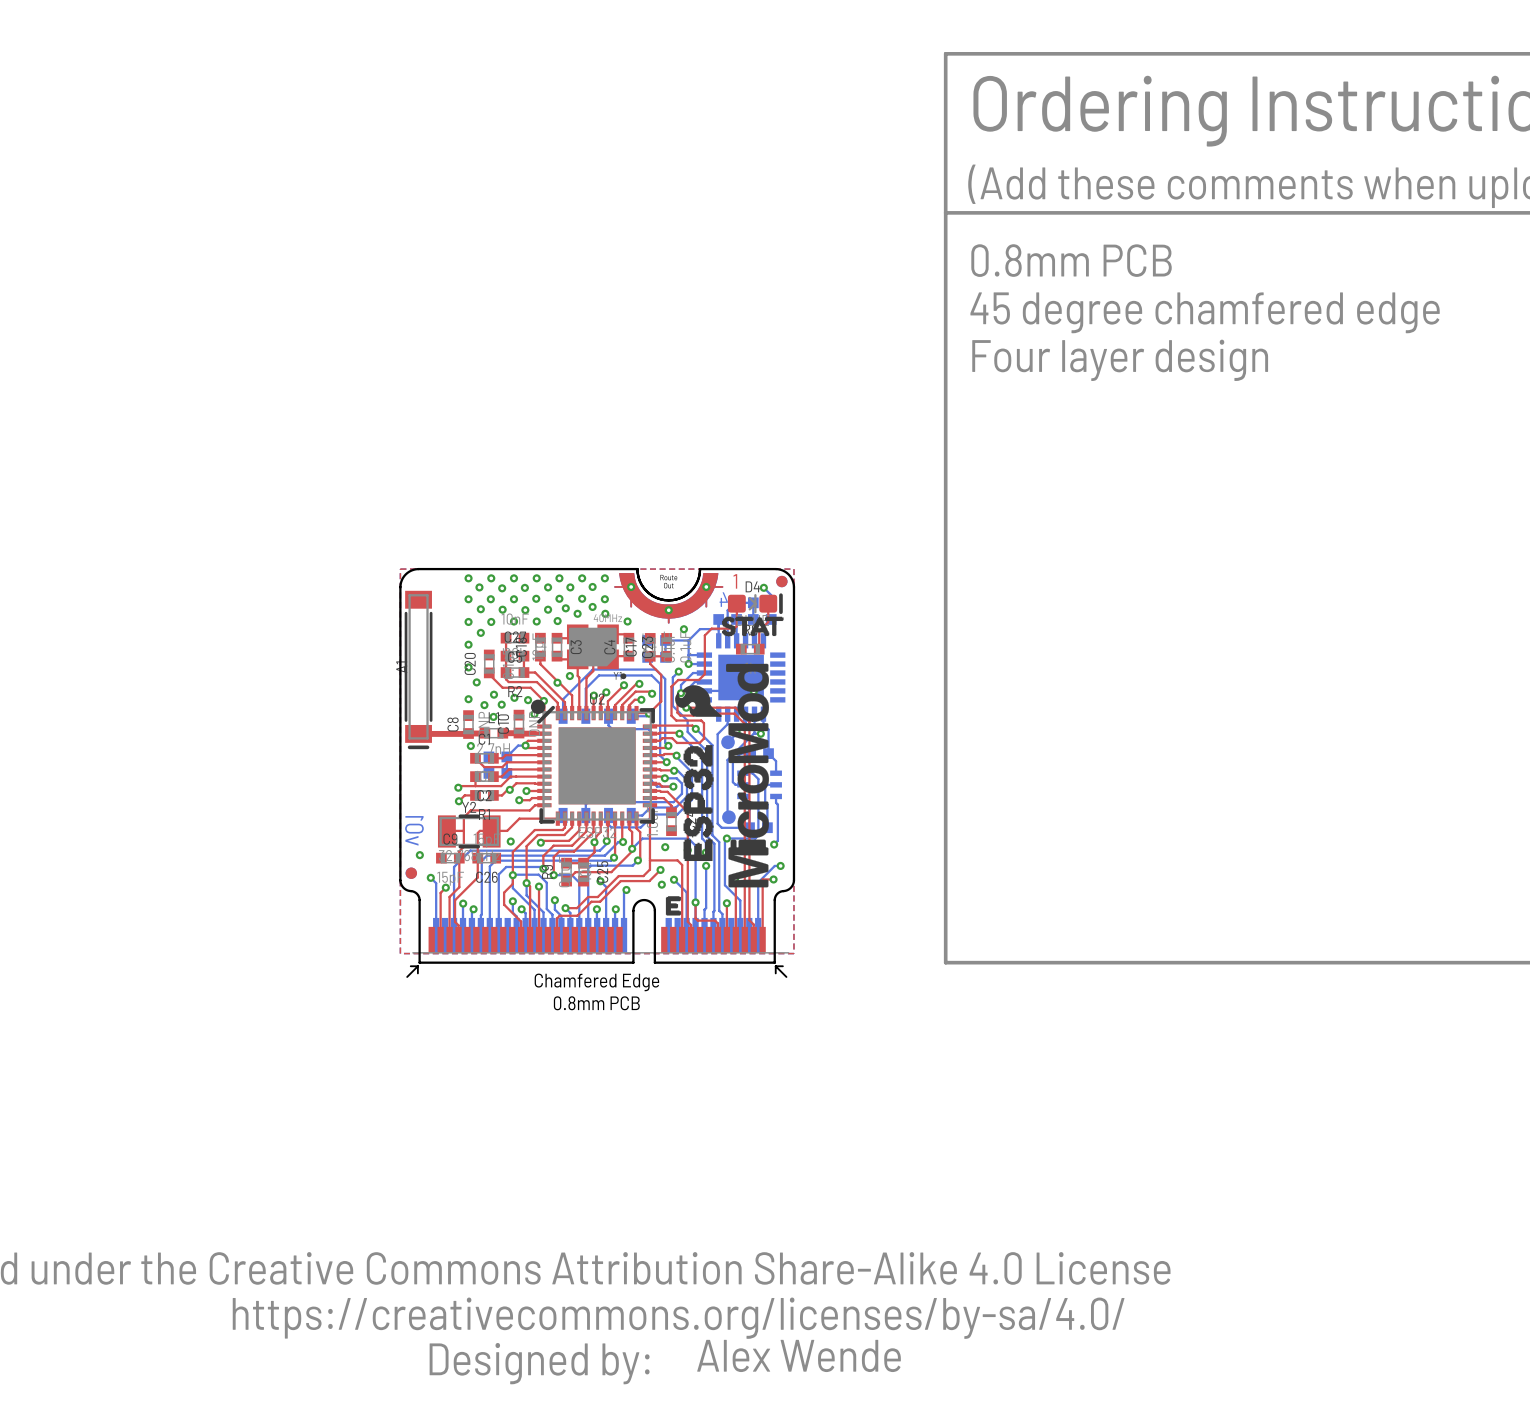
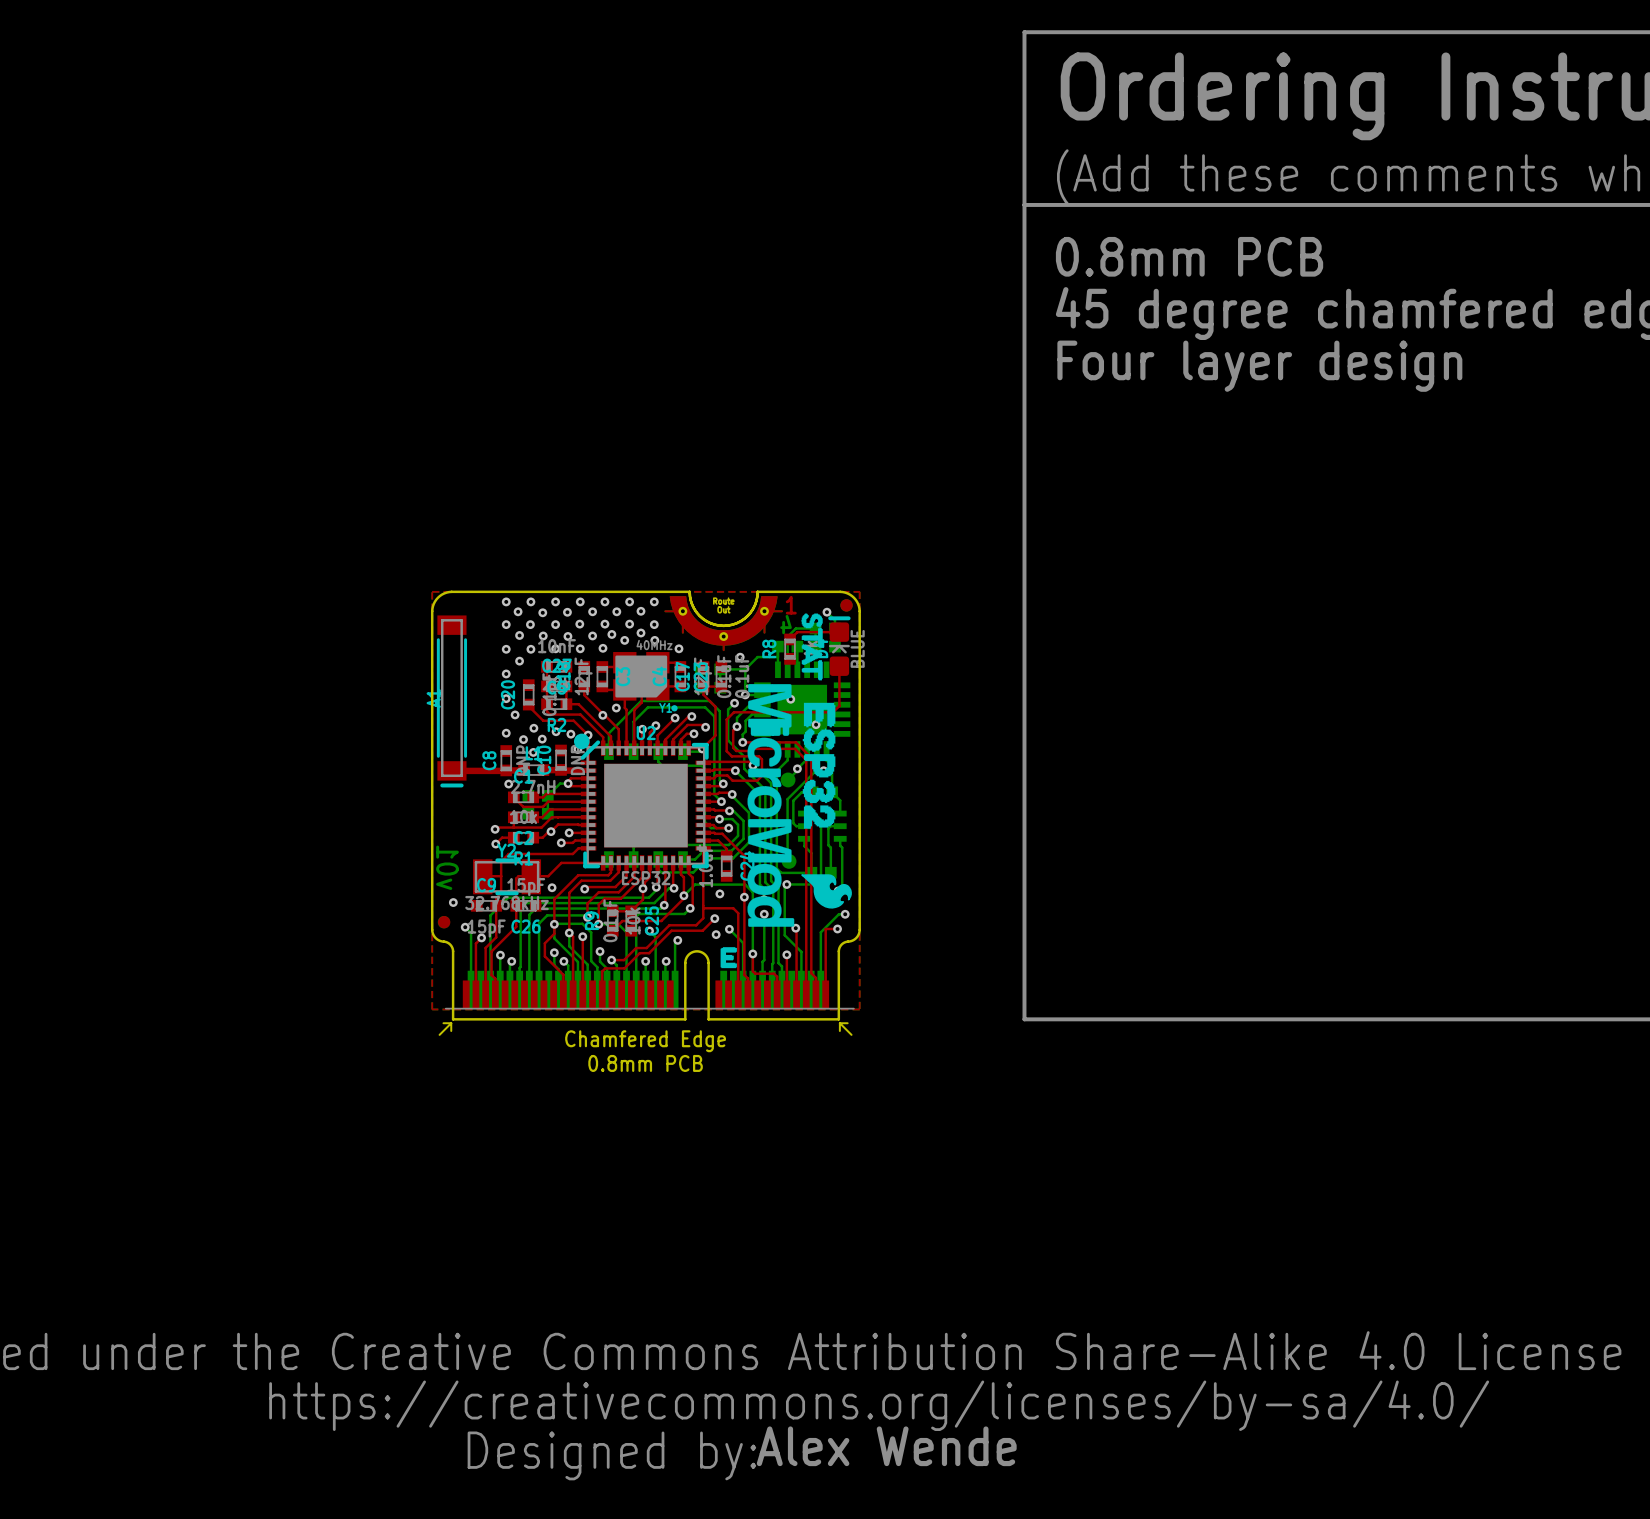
top track: (736, 603) (736, 626) (734, 628) (711, 628) (704, 635) (704, 674) (698, 679) -> (839, 666) (839, 706) (833, 712) (756, 712)
D4 rotation: 0° (755, 603) -> 90° counterclockwise (839, 646)
top track: (768, 603) (768, 622) (759, 631) (759, 649) -> none
top track: none -> (839, 632) (797, 632) (790, 639)
drawing shape: [722, 616, 784, 637] -> [800, 613, 823, 681]
R8 rotation: 0° (750, 649) -> 90° clockwise (790, 649)
R8 position: (750, 649) -> (790, 649)
drawing: none -> [747, 684, 852, 927]
drawing: [675, 663, 770, 888] -> none

